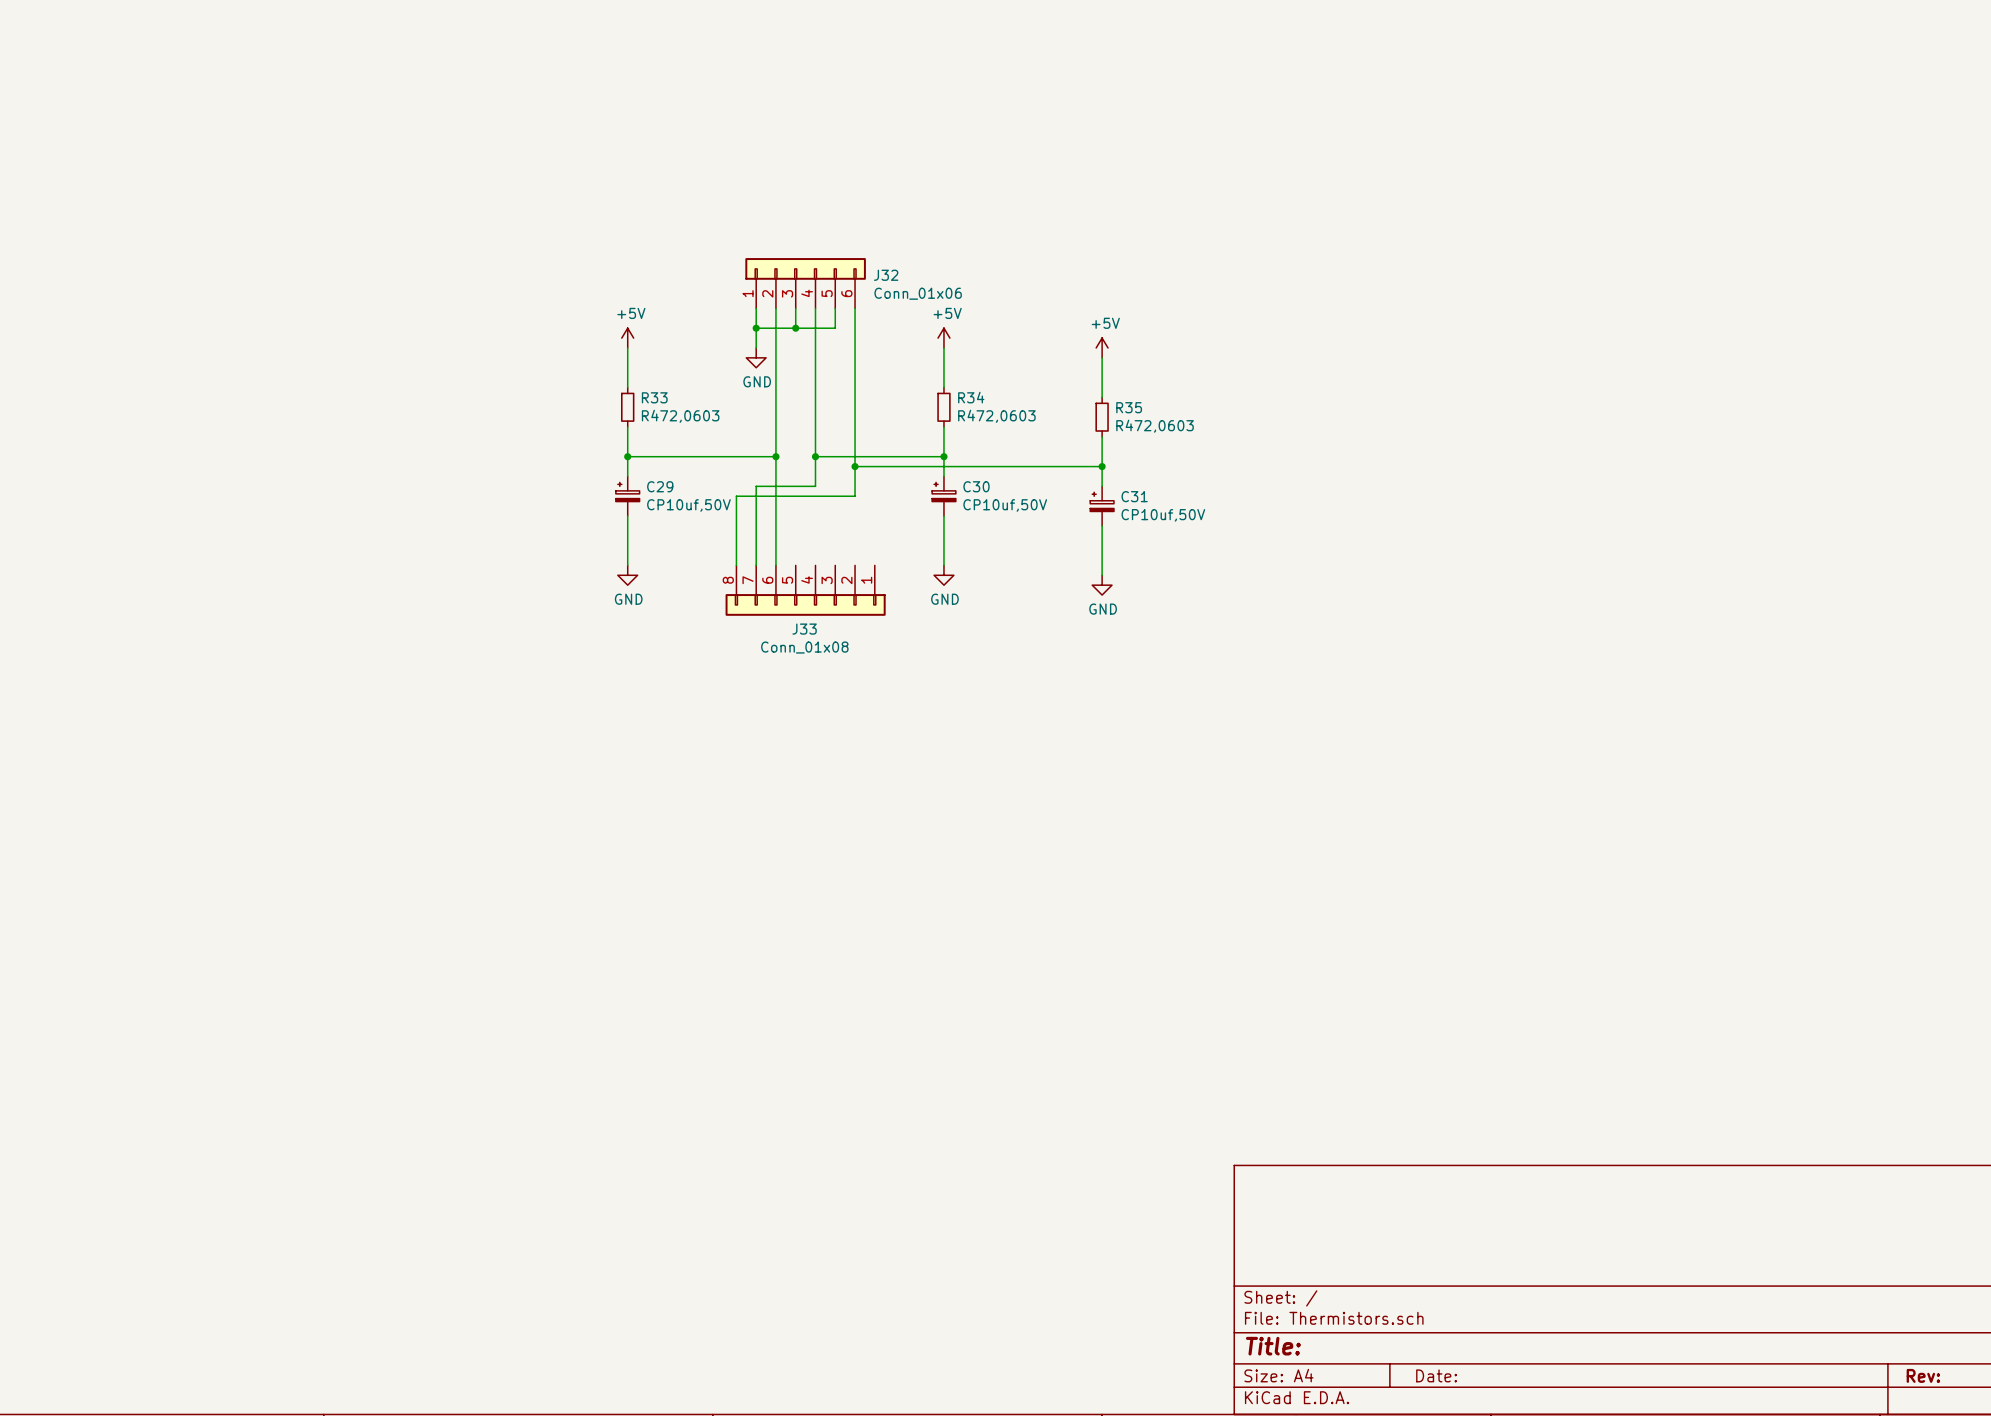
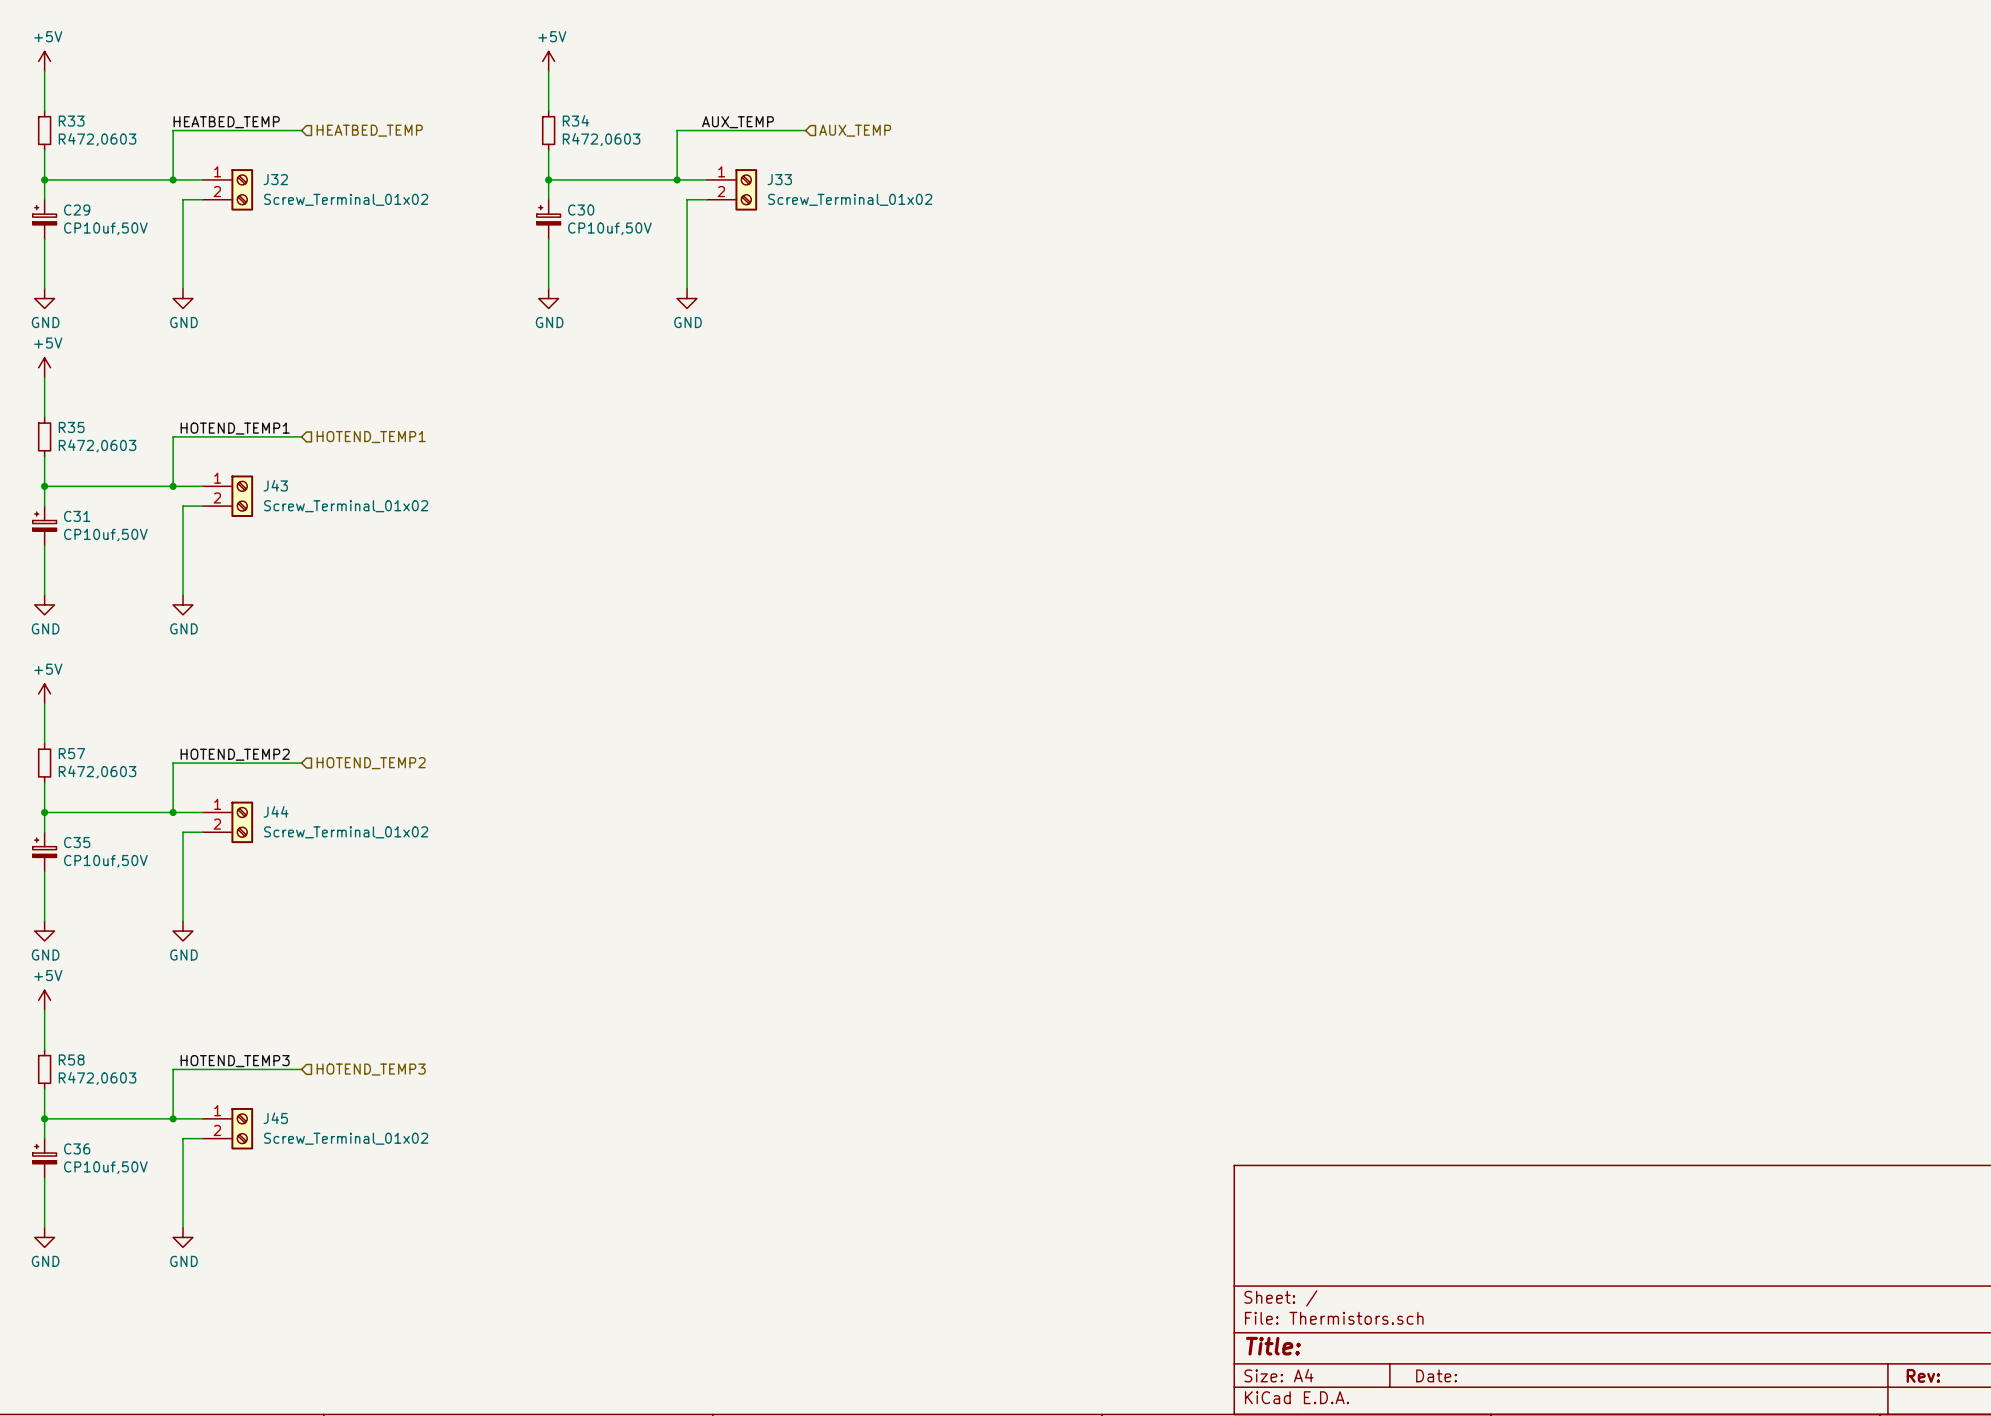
power symbol: none -> +5V (44, 61)
power symbol: none -> +5V (548, 61)
wire: none -> (44, 71) (44, 110)
wire: none -> (548, 71) (548, 110)
label: none -> HEATBED_TEMP (226, 122)
label: none -> AUX_TEMP (738, 122)
wire: none -> (301, 130) (173, 130) (173, 179)
hierarchical label: none -> HEATBED_TEMP (369, 130)
wire: none -> (805, 130) (677, 130) (677, 179)
hierarchical label: none -> AUX_TEMP (855, 130)
wire: none -> (44, 150) (44, 199)
wire: none -> (548, 150) (548, 199)
wire: none -> (44, 179) (202, 179)
junction: none -> (44, 179)
junction: none -> (173, 179)
wire: none -> (548, 179) (706, 179)
junction: none -> (548, 179)
junction: none -> (677, 179)
wire: none -> (202, 199) (182, 199) (182, 288)
wire: none -> (706, 199) (687, 199) (687, 288)
wire: none -> (44, 239) (44, 288)
wire: none -> (548, 239) (548, 288)
J32 symbol: [745, 258, 866, 309] -> [202, 169, 254, 211]
J32 name position: J32 (886, 275) -> J32 (275, 179)
J32 value: Conn_01x06 (918, 293) -> Screw_Terminal_01x02 (346, 199)
power symbol: none -> GND (44, 298)
power symbol: none -> GND (182, 298)
power symbol: none -> GND (548, 298)
wire: (756, 308) (756, 347) -> none
wire: (775, 308) (775, 565) -> none
wire: (795, 308) (795, 328) -> none
wire: (815, 308) (815, 486) (756, 486) (756, 565) -> none
wire: (835, 308) (835, 328) (756, 328) -> none
wire: (855, 308) (855, 496) (736, 496) (736, 565) -> none
junction: (756, 328) -> none
junction: (795, 328) -> none
power symbol: +5V (627, 338) -> none
power symbol: +5V (943, 338) -> none
wire: (627, 347) (627, 387) -> none
wire: (943, 347) (943, 387) -> none
power symbol: +5V (1102, 347) -> none
power symbol position: GND (756, 357) -> GND (687, 298)
wire: (1102, 357) (1102, 397) -> none
power symbol: none -> +5V (44, 367)
wire: none -> (44, 377) (44, 417)
R33 position: (627, 407) -> (44, 130)
R34 position: (943, 407) -> (548, 130)
R35 position: (1102, 417) -> (44, 436)
wire: (627, 427) (627, 476) -> none
wire: (943, 427) (943, 476) -> none
label: none -> HOTEND_TEMP1 (235, 428)
wire: none -> (301, 436) (173, 436) (173, 486)
wire: (1102, 436) (1102, 486) -> none
hierarchical label: none -> HOTEND_TEMP1 (371, 437)
wire: none -> (44, 456) (44, 506)
wire: (627, 456) (775, 456) -> none
junction: (627, 456) -> none
junction: (775, 456) -> none
wire: (815, 456) (943, 456) -> none
junction: (815, 456) -> none
junction: (943, 456) -> none
wire: (855, 466) (1102, 466) -> none
junction: (855, 466) -> none
junction: (1102, 466) -> none
wire: none -> (44, 486) (202, 486)
junction: none -> (44, 486)
junction: none -> (173, 486)
J43: none -> Screw_Terminal_01x02 (227, 496)
C29 position: (627, 496) -> (44, 219)
C30 position: (943, 496) -> (548, 219)
wire: none -> (202, 506) (182, 506) (182, 595)
C31 position: (1102, 506) -> (44, 525)
wire: (627, 515) (627, 565) -> none
wire: (943, 515) (943, 565) -> none
wire: (1102, 525) (1102, 575) -> none
wire: none -> (44, 545) (44, 595)
J33 symbol: [725, 565, 886, 616] -> [706, 169, 758, 211]
power symbol: GND (627, 575) -> none
power symbol: GND (943, 575) -> none
power symbol: GND (1102, 585) -> none
power symbol: none -> GND (44, 604)
power symbol: none -> GND (182, 604)
J33 name position: J33 (804, 629) -> J33 (779, 179)
J33 value: Conn_01x08 (804, 647) -> Screw_Terminal_01x02 (850, 199)
power symbol: none -> +5V (44, 693)
wire: none -> (44, 703) (44, 743)
label: none -> HOTEND_TEMP2 (235, 754)
R57: none -> R472,0603 (44, 763)
wire: none -> (301, 763) (173, 763) (173, 812)
hierarchical label: none -> HOTEND_TEMP2 (371, 763)
wire: none -> (44, 782) (44, 832)
wire: none -> (44, 812) (202, 812)
junction: none -> (44, 812)
junction: none -> (173, 812)
J44: none -> Screw_Terminal_01x02 (227, 822)
wire: none -> (202, 832) (182, 832) (182, 921)
C35: none -> CP10uf,50V (44, 852)
wire: none -> (44, 871) (44, 921)
power symbol: none -> GND (44, 931)
power symbol: none -> GND (182, 931)
power symbol: none -> +5V (44, 1000)
wire: none -> (44, 1010) (44, 1049)
label: none -> HOTEND_TEMP3 (235, 1061)
R58: none -> R472,0603 (44, 1069)
wire: none -> (301, 1069) (173, 1069) (173, 1118)
hierarchical label: none -> HOTEND_TEMP3 (371, 1069)
wire: none -> (44, 1089) (44, 1138)
wire: none -> (44, 1118) (202, 1118)
junction: none -> (44, 1118)
junction: none -> (173, 1118)
J45: none -> Screw_Terminal_01x02 (227, 1128)
wire: none -> (202, 1138) (182, 1138) (182, 1227)
C36: none -> CP10uf,50V (44, 1158)
wire: none -> (44, 1178) (44, 1227)
power symbol: none -> GND (44, 1237)
power symbol: none -> GND (182, 1237)

